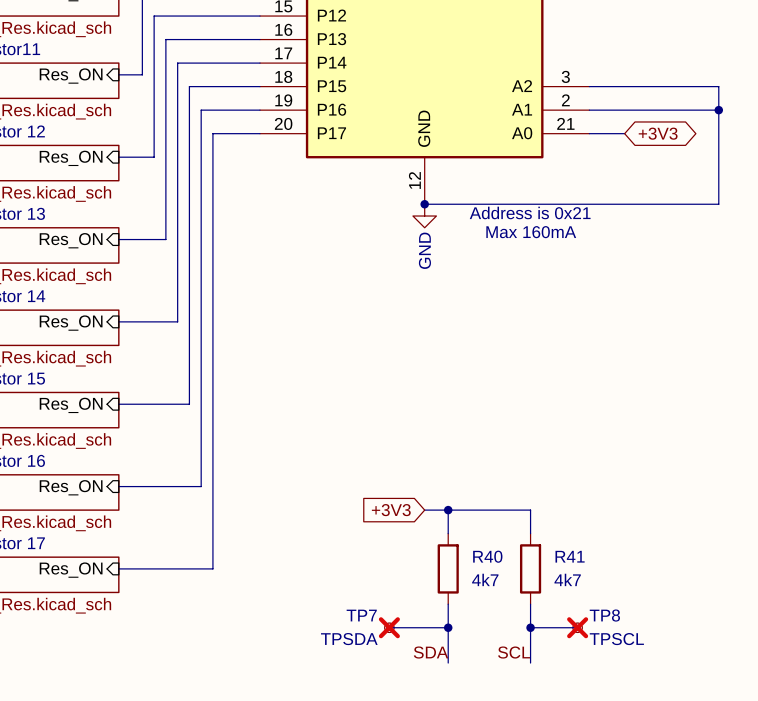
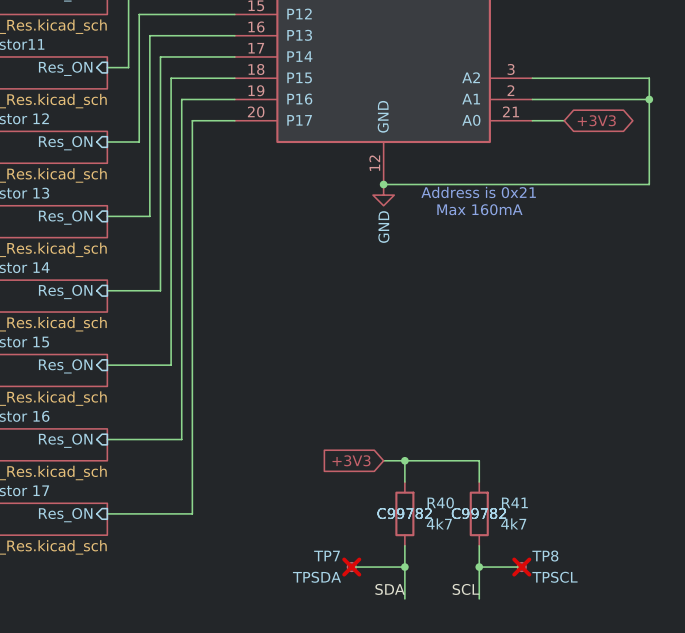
R40 text: none -> C99782 (404, 513)
R40 text: none -> C99782 (404, 513)
R41 text: none -> C99782 (478, 513)
R41 text: none -> C99782 (478, 513)

